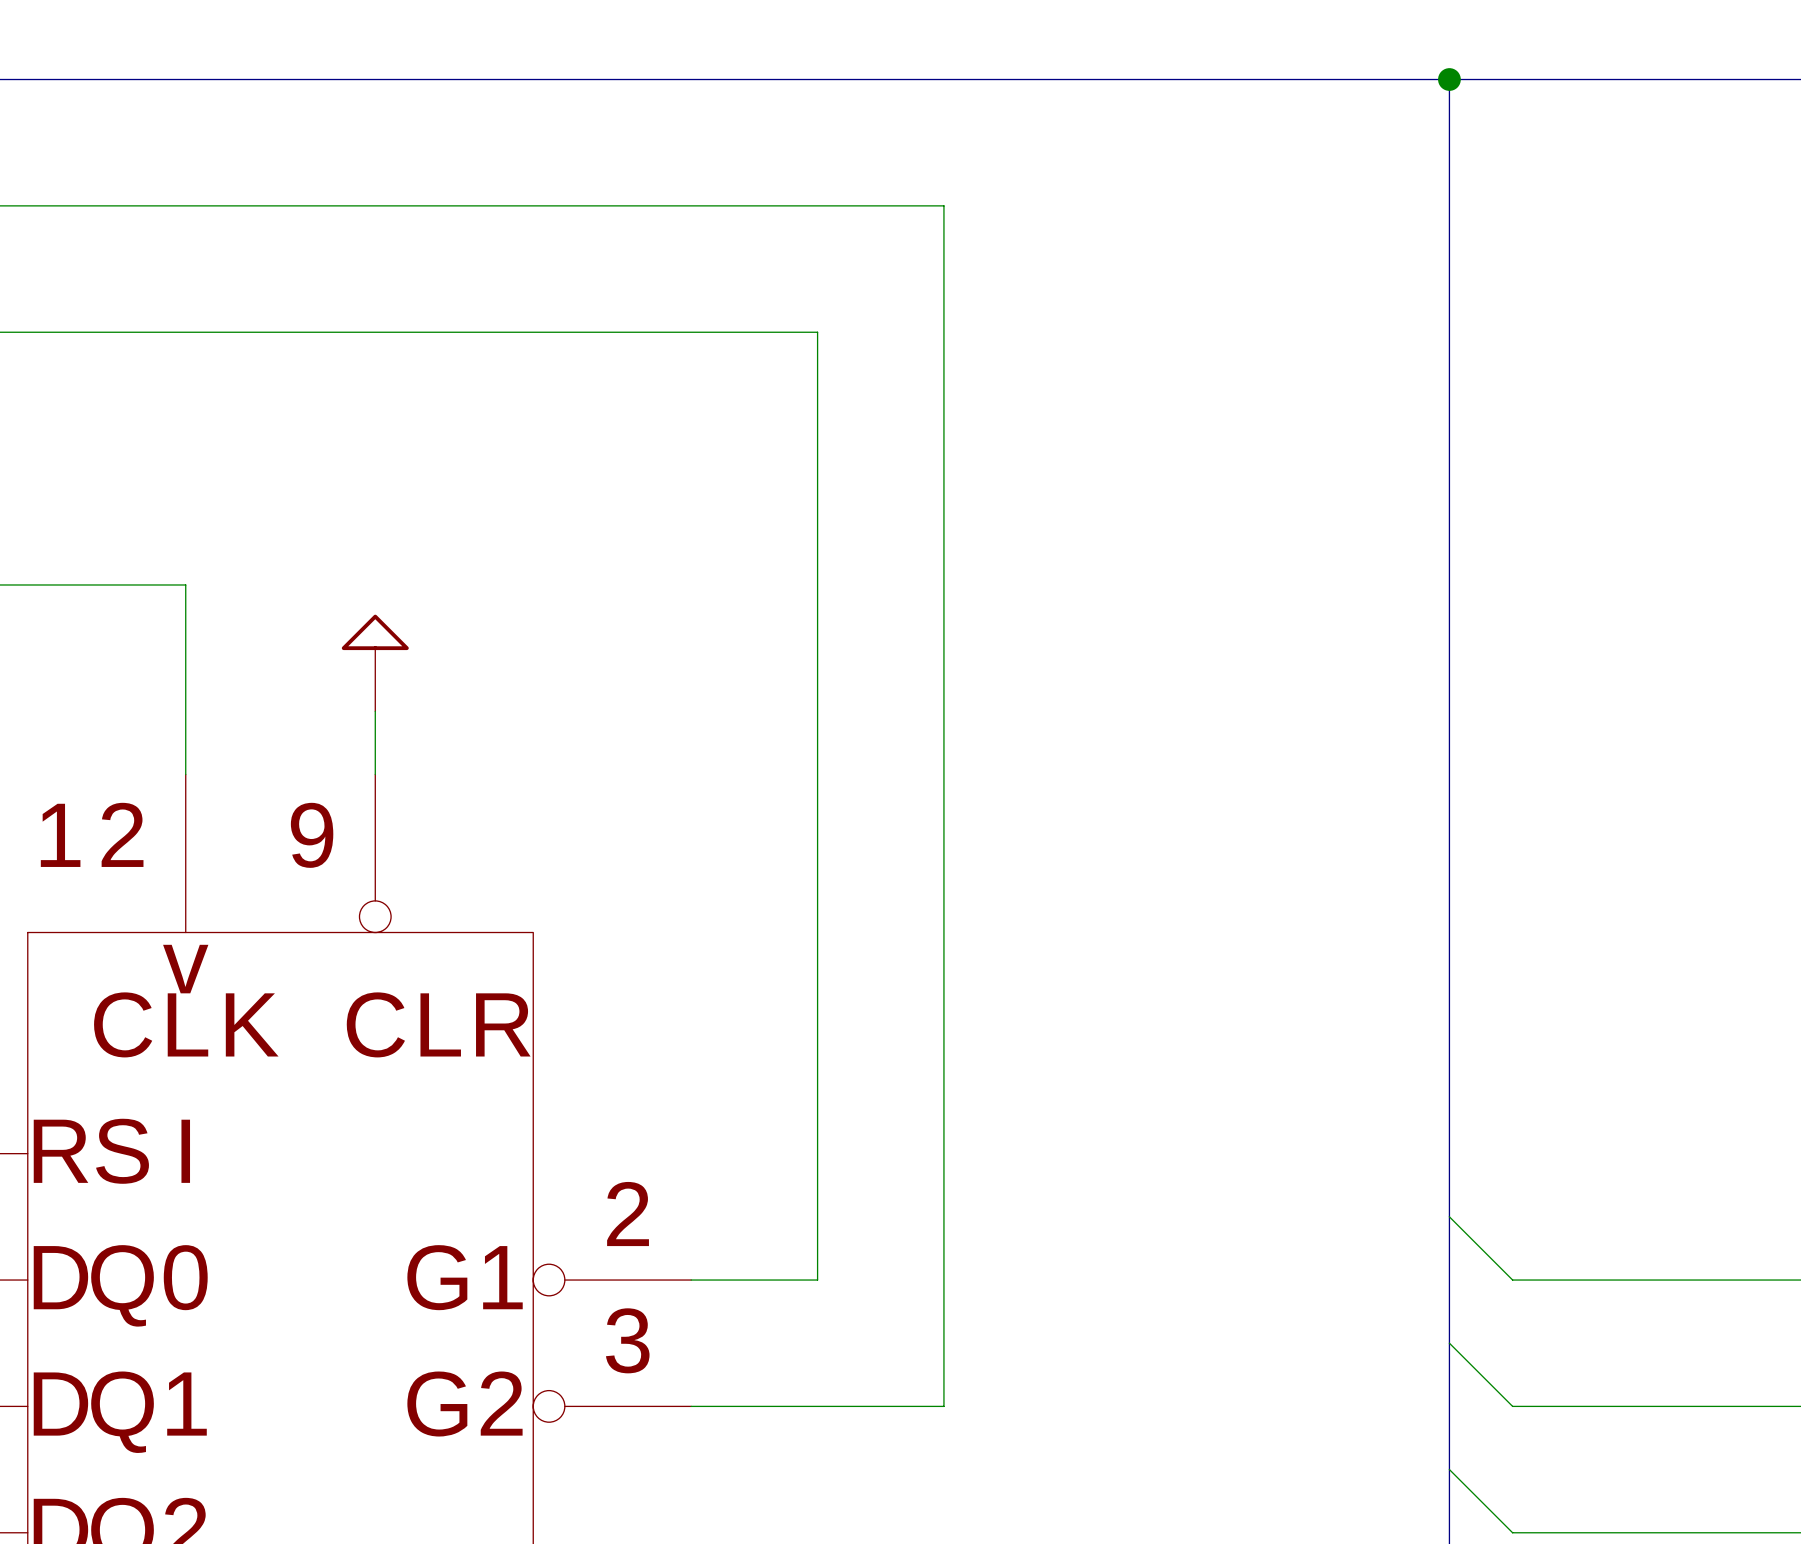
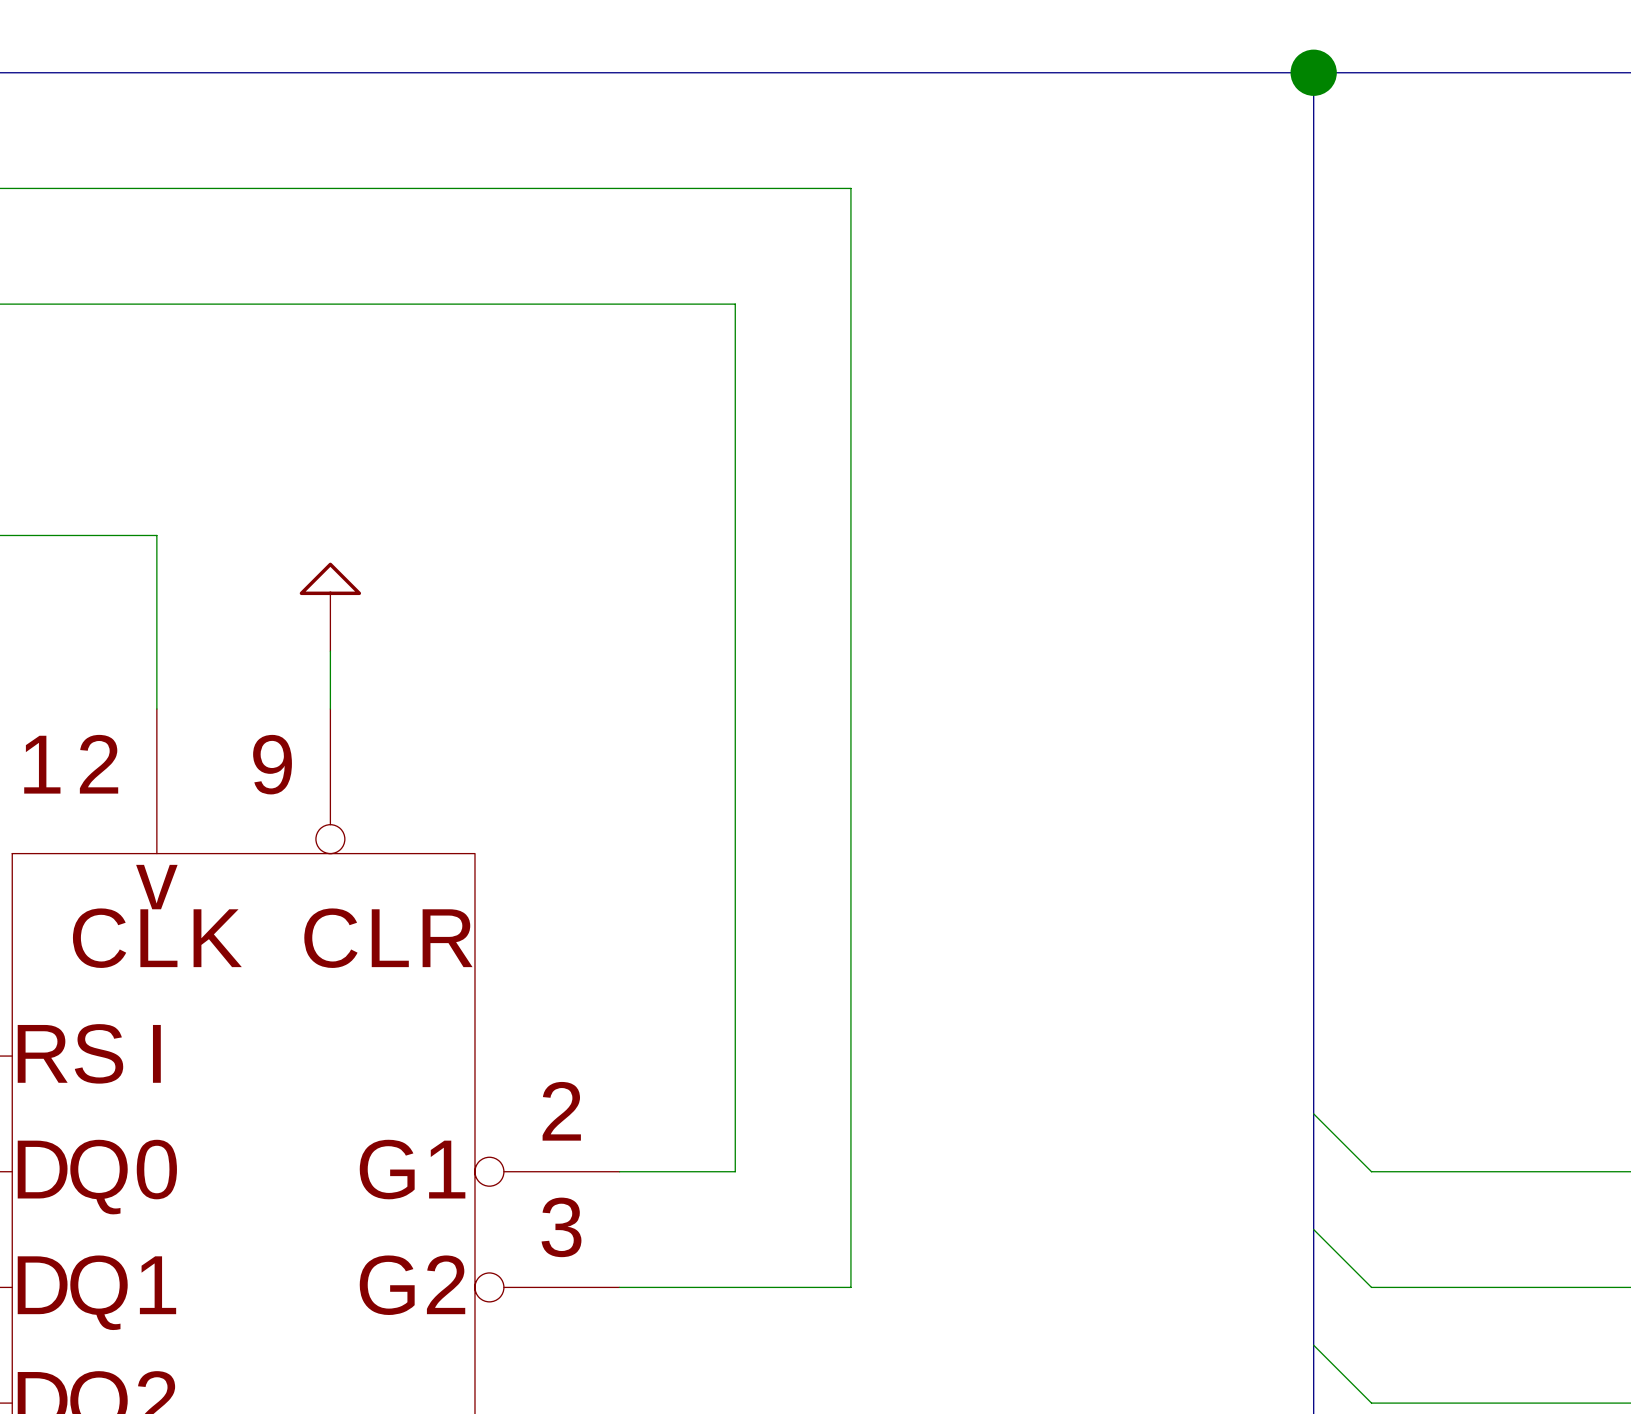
junction size: [1438, 68, 1461, 91] -> [1290, 49, 1337, 96]

